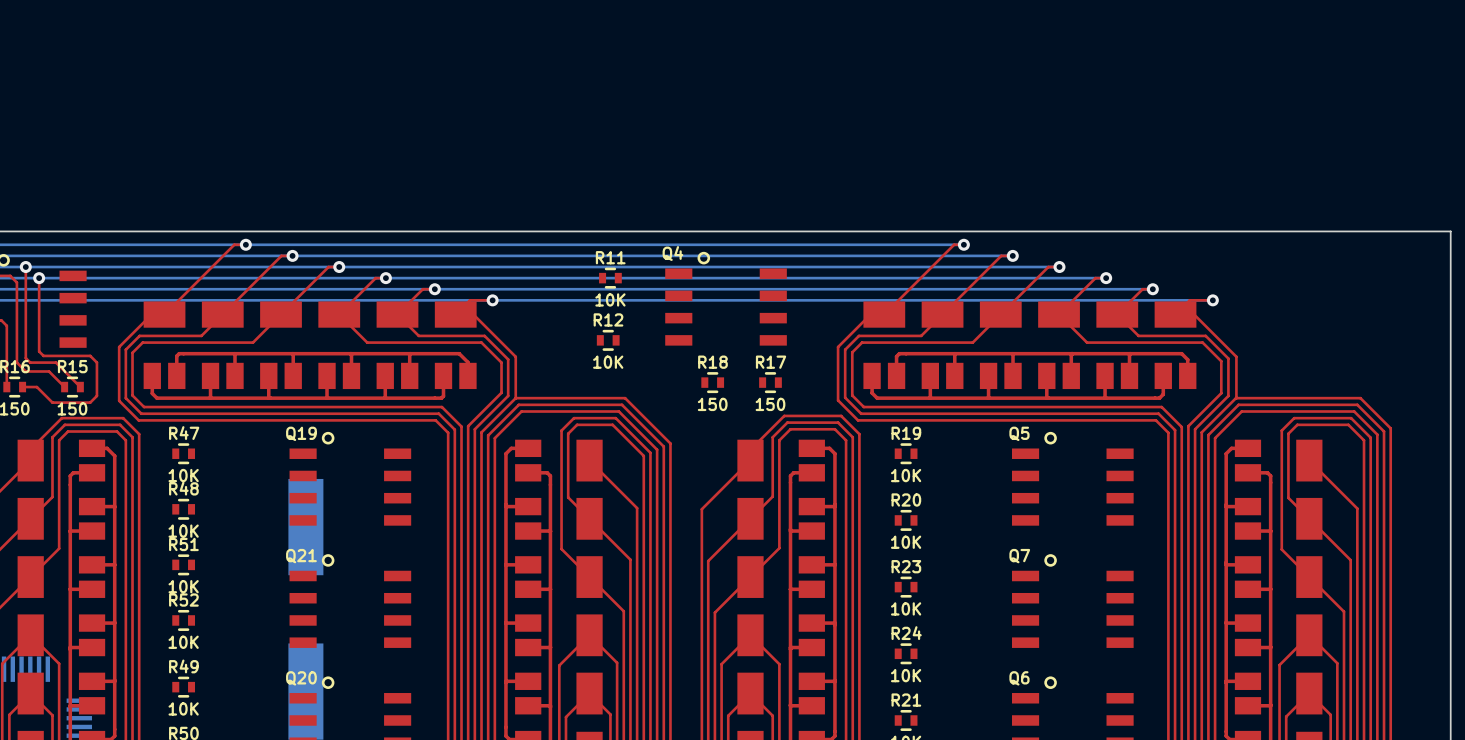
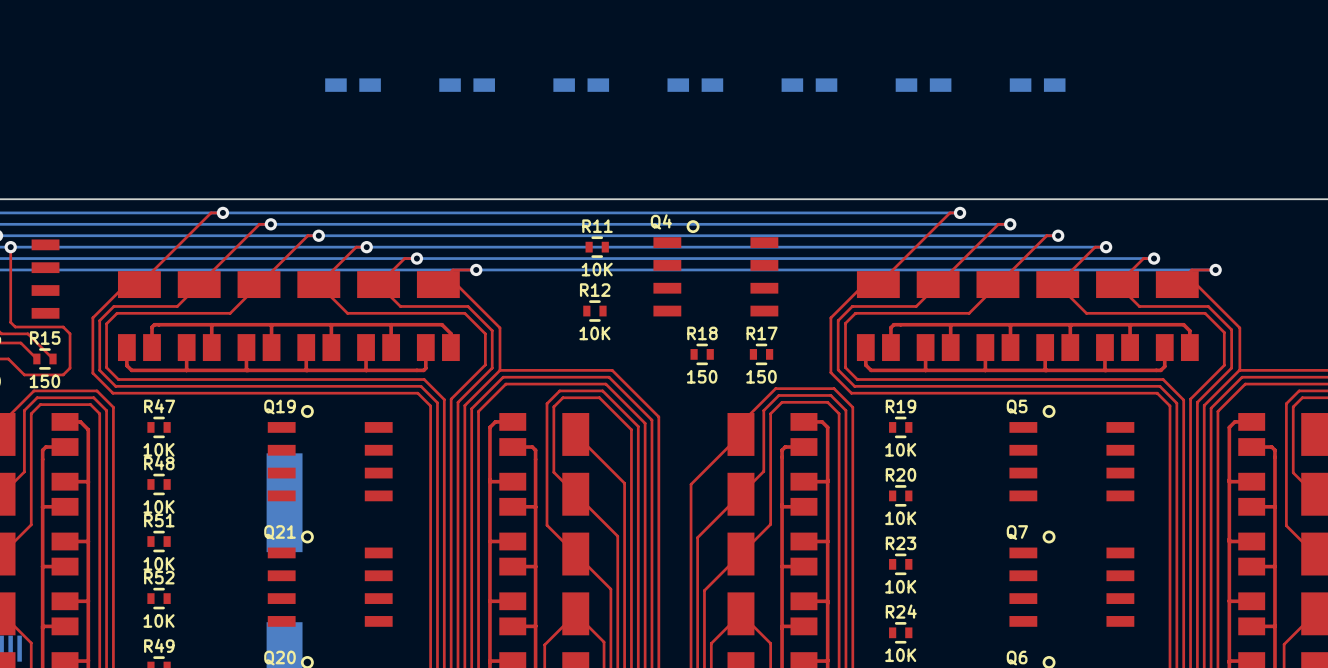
part: none -> (353, 85)
part: none -> (467, 85)
part: none -> (581, 85)
part: none -> (695, 85)
part: none -> (809, 85)
part: none -> (923, 85)
part: none -> (1037, 85)

